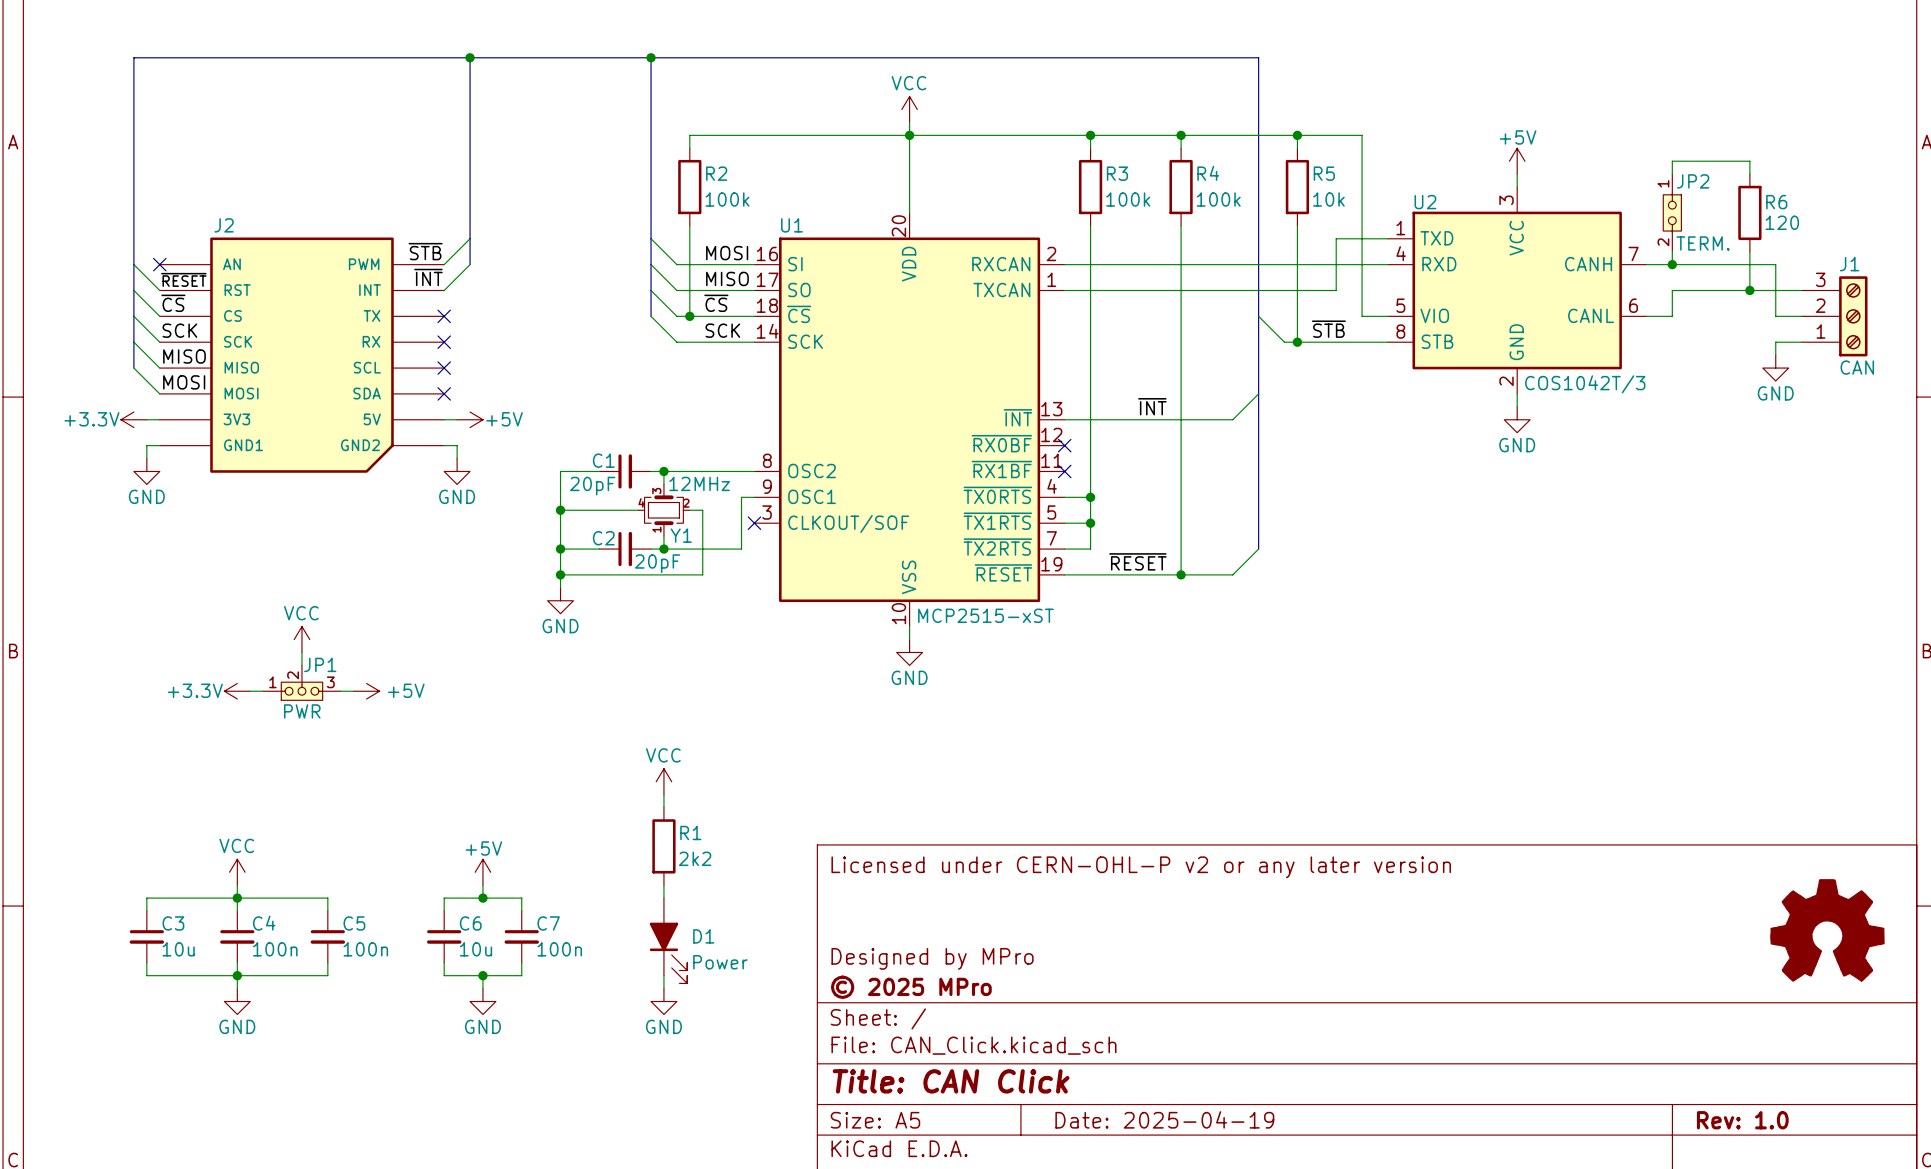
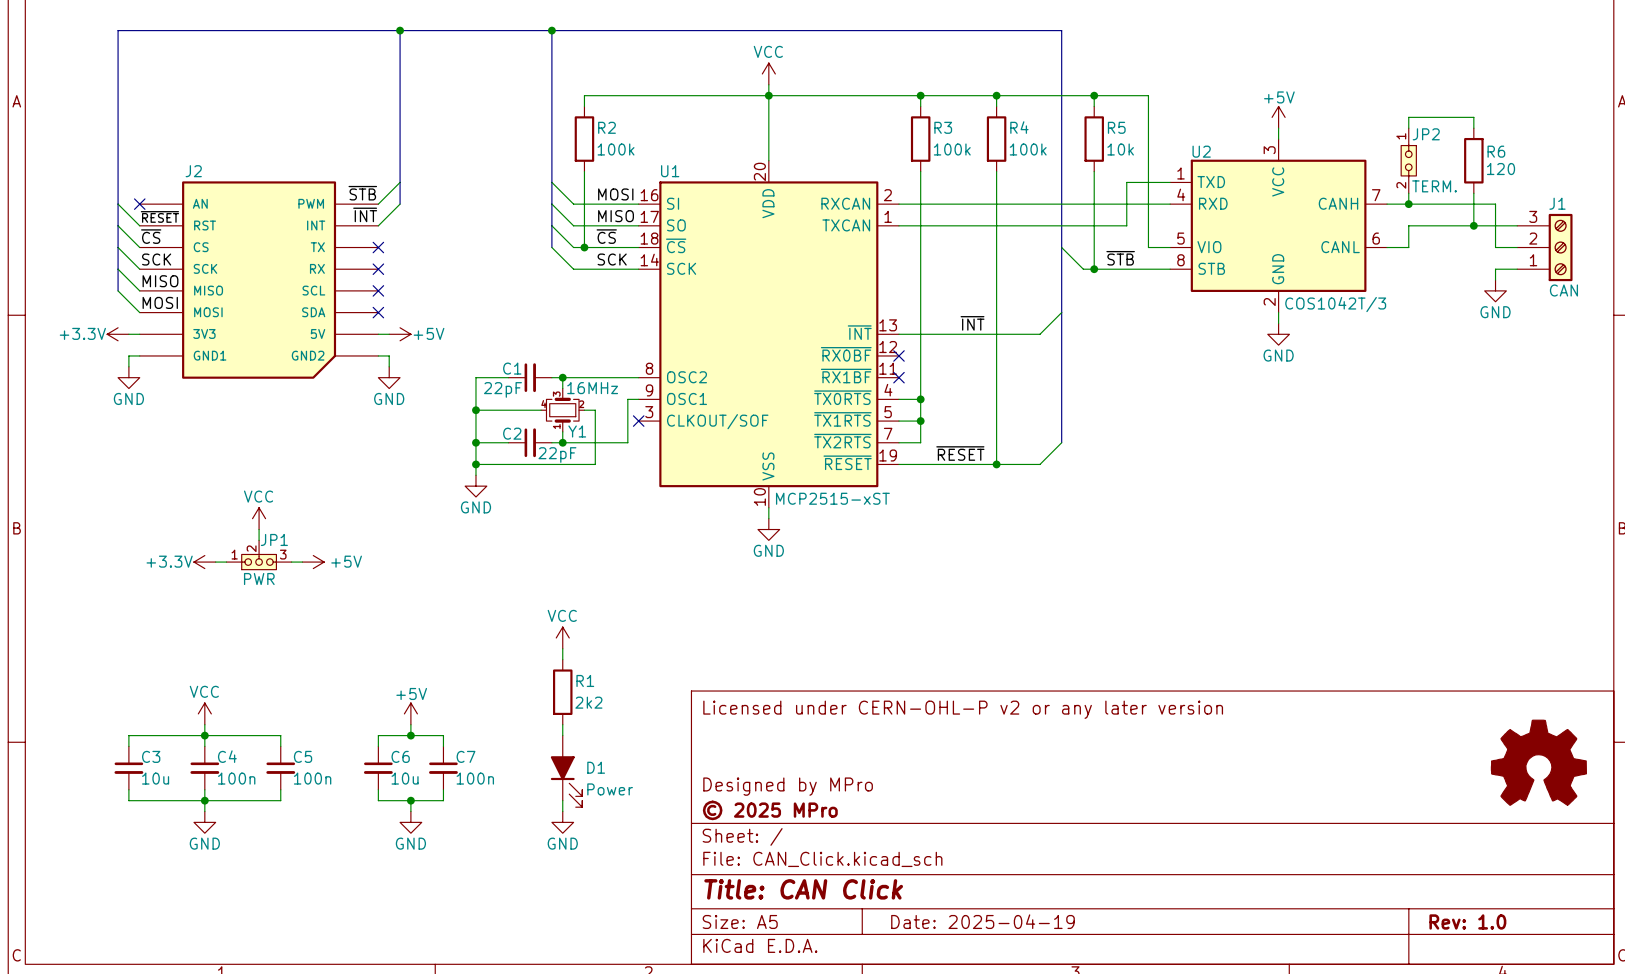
Y1 value: 12MHz (699, 483) -> 16MHz (592, 388)
C1 value: 20pF (592, 486) -> 22pF (502, 389)
C2 value: 20pF (657, 563) -> 22pF (557, 455)

